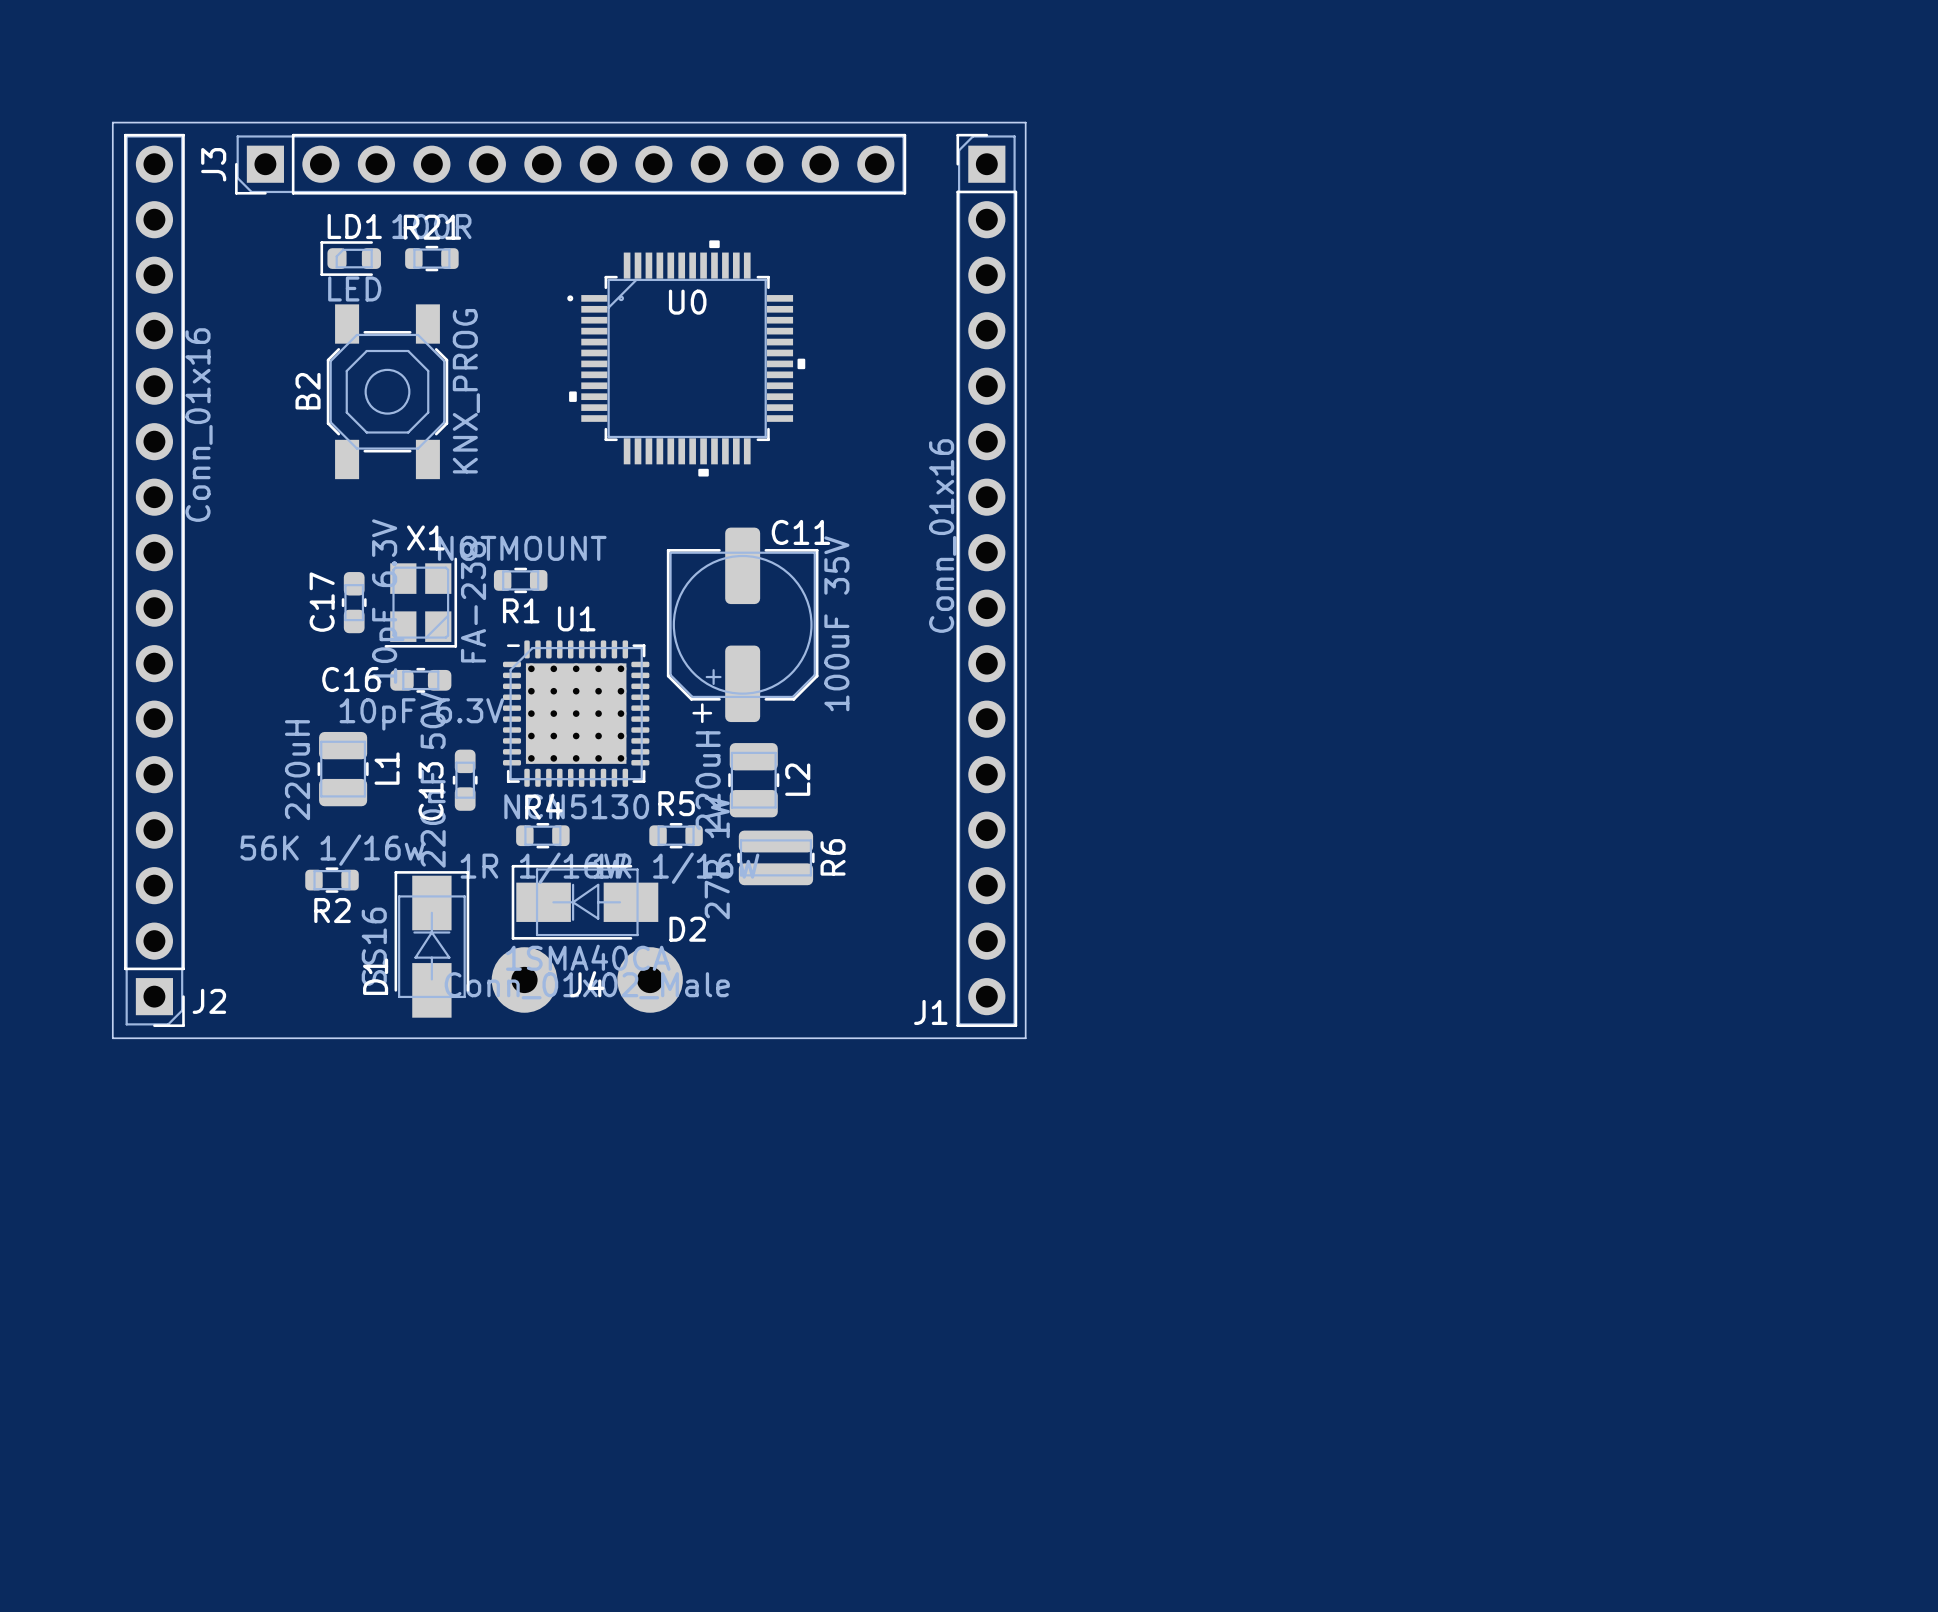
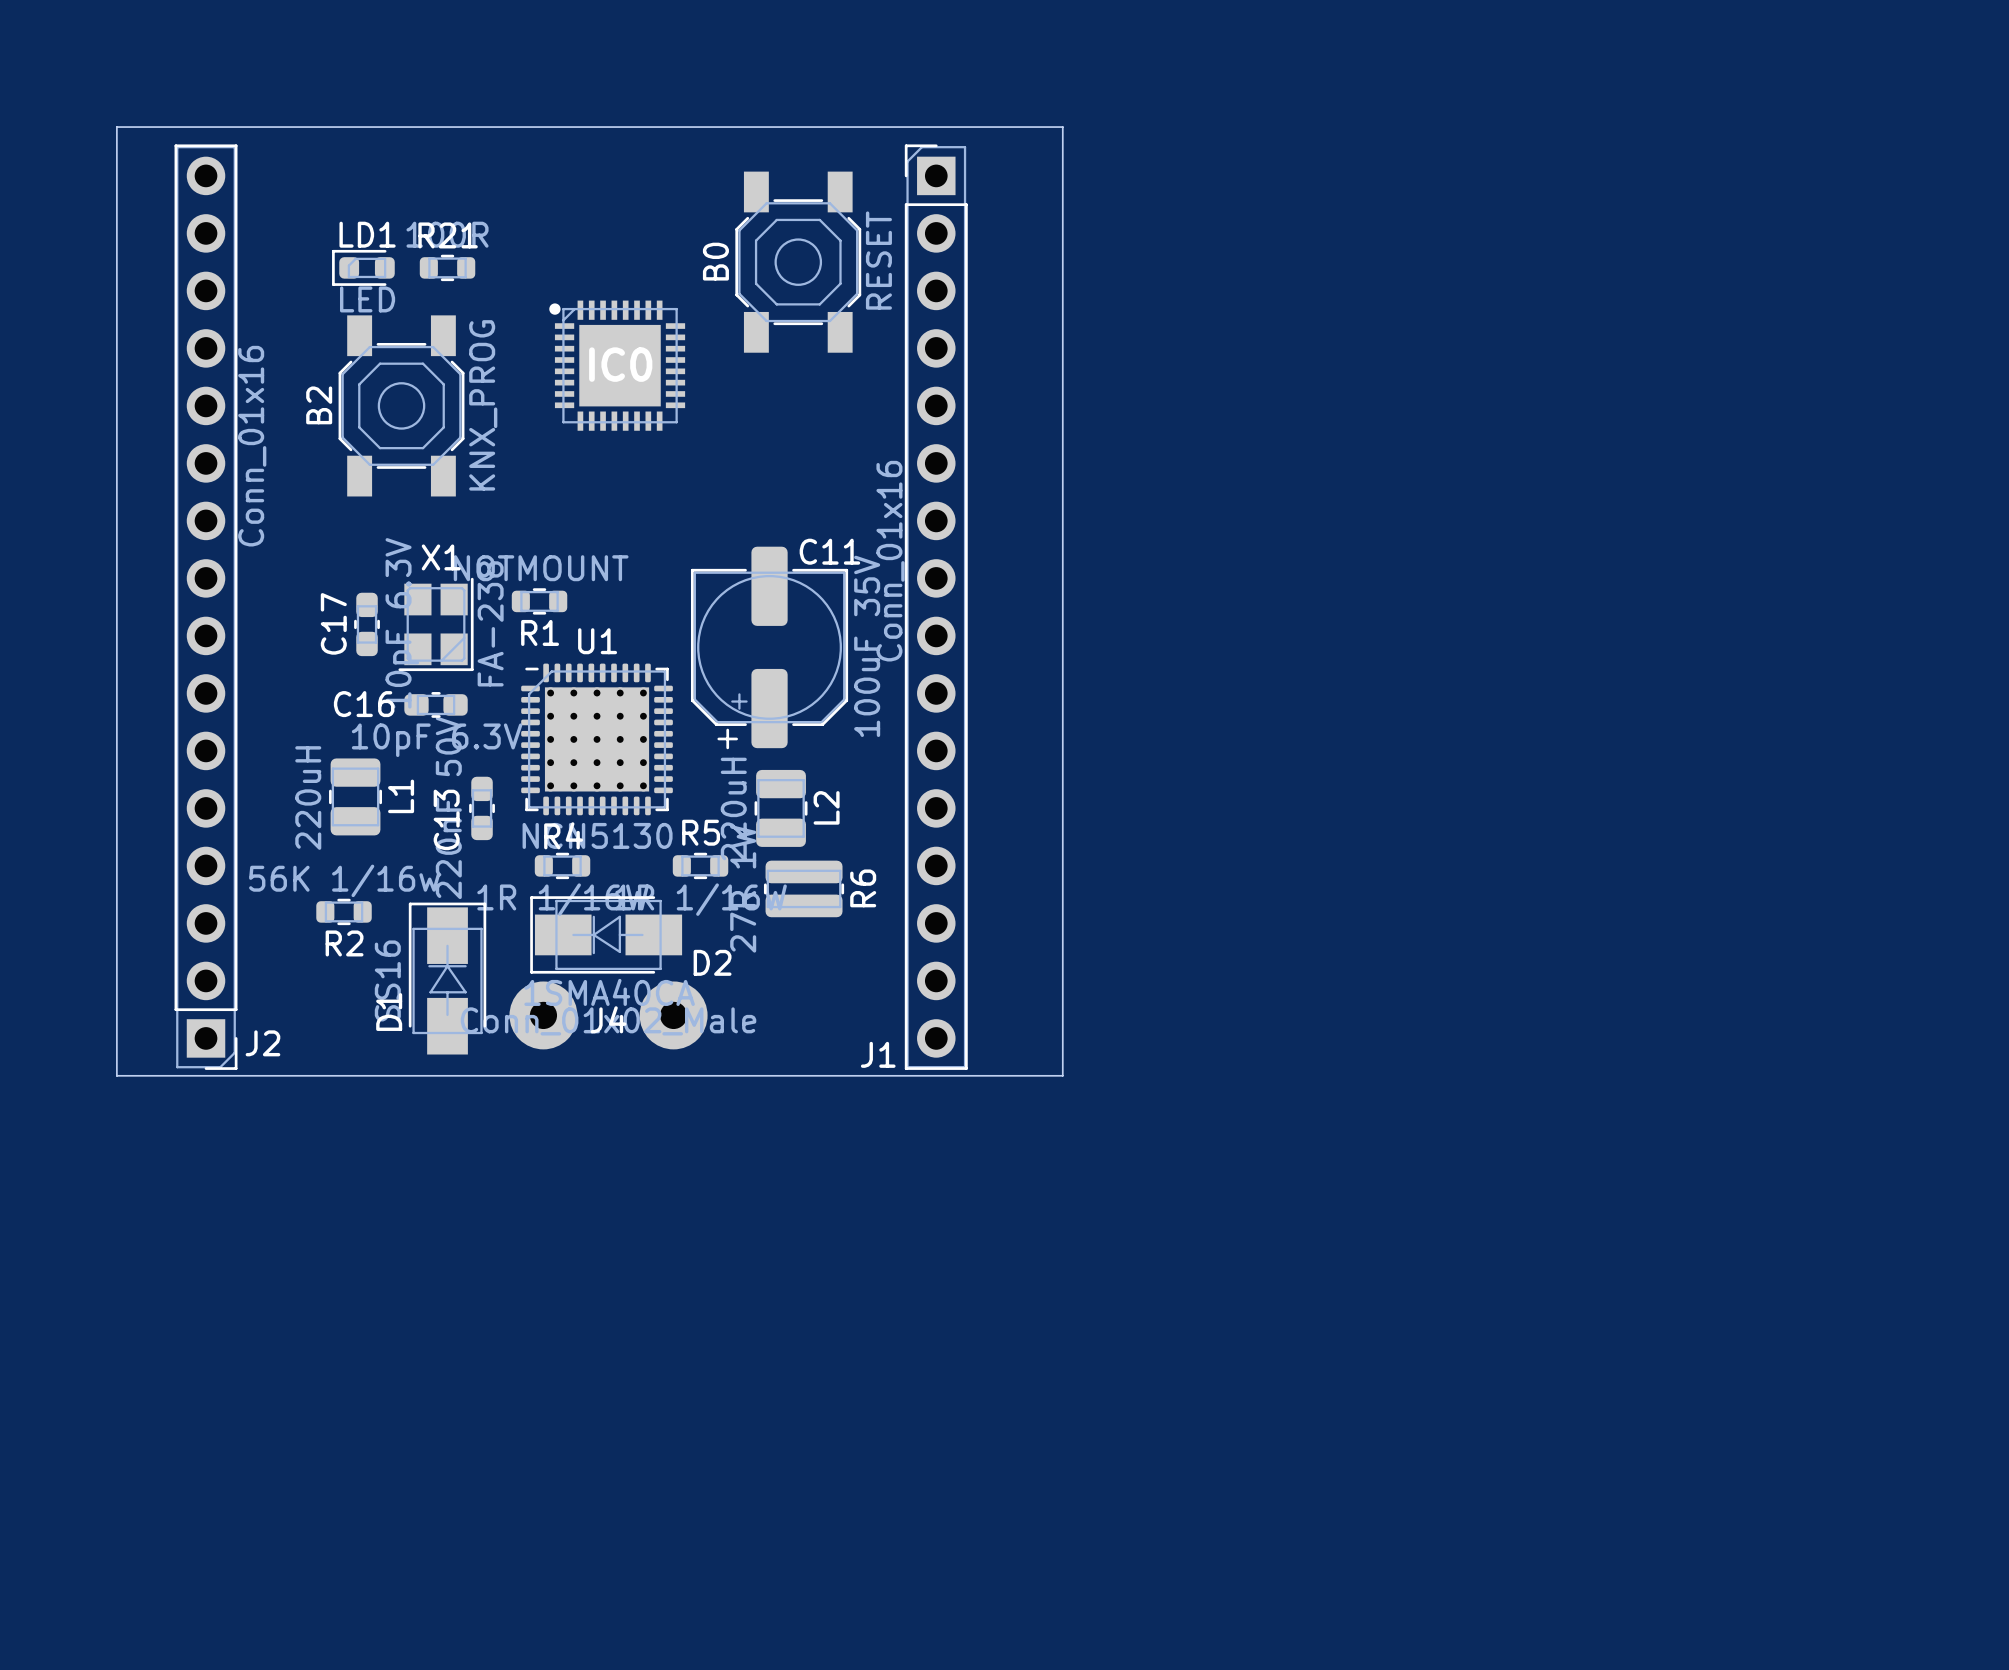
J3: (570, 164) -> none
B0: none -> RESET (798, 262)
part: none -> (617, 365)
U0: (686, 358) -> none
J2 position: (154, 580) -> (206, 607)
J1 position: (986, 580) -> (936, 607)

